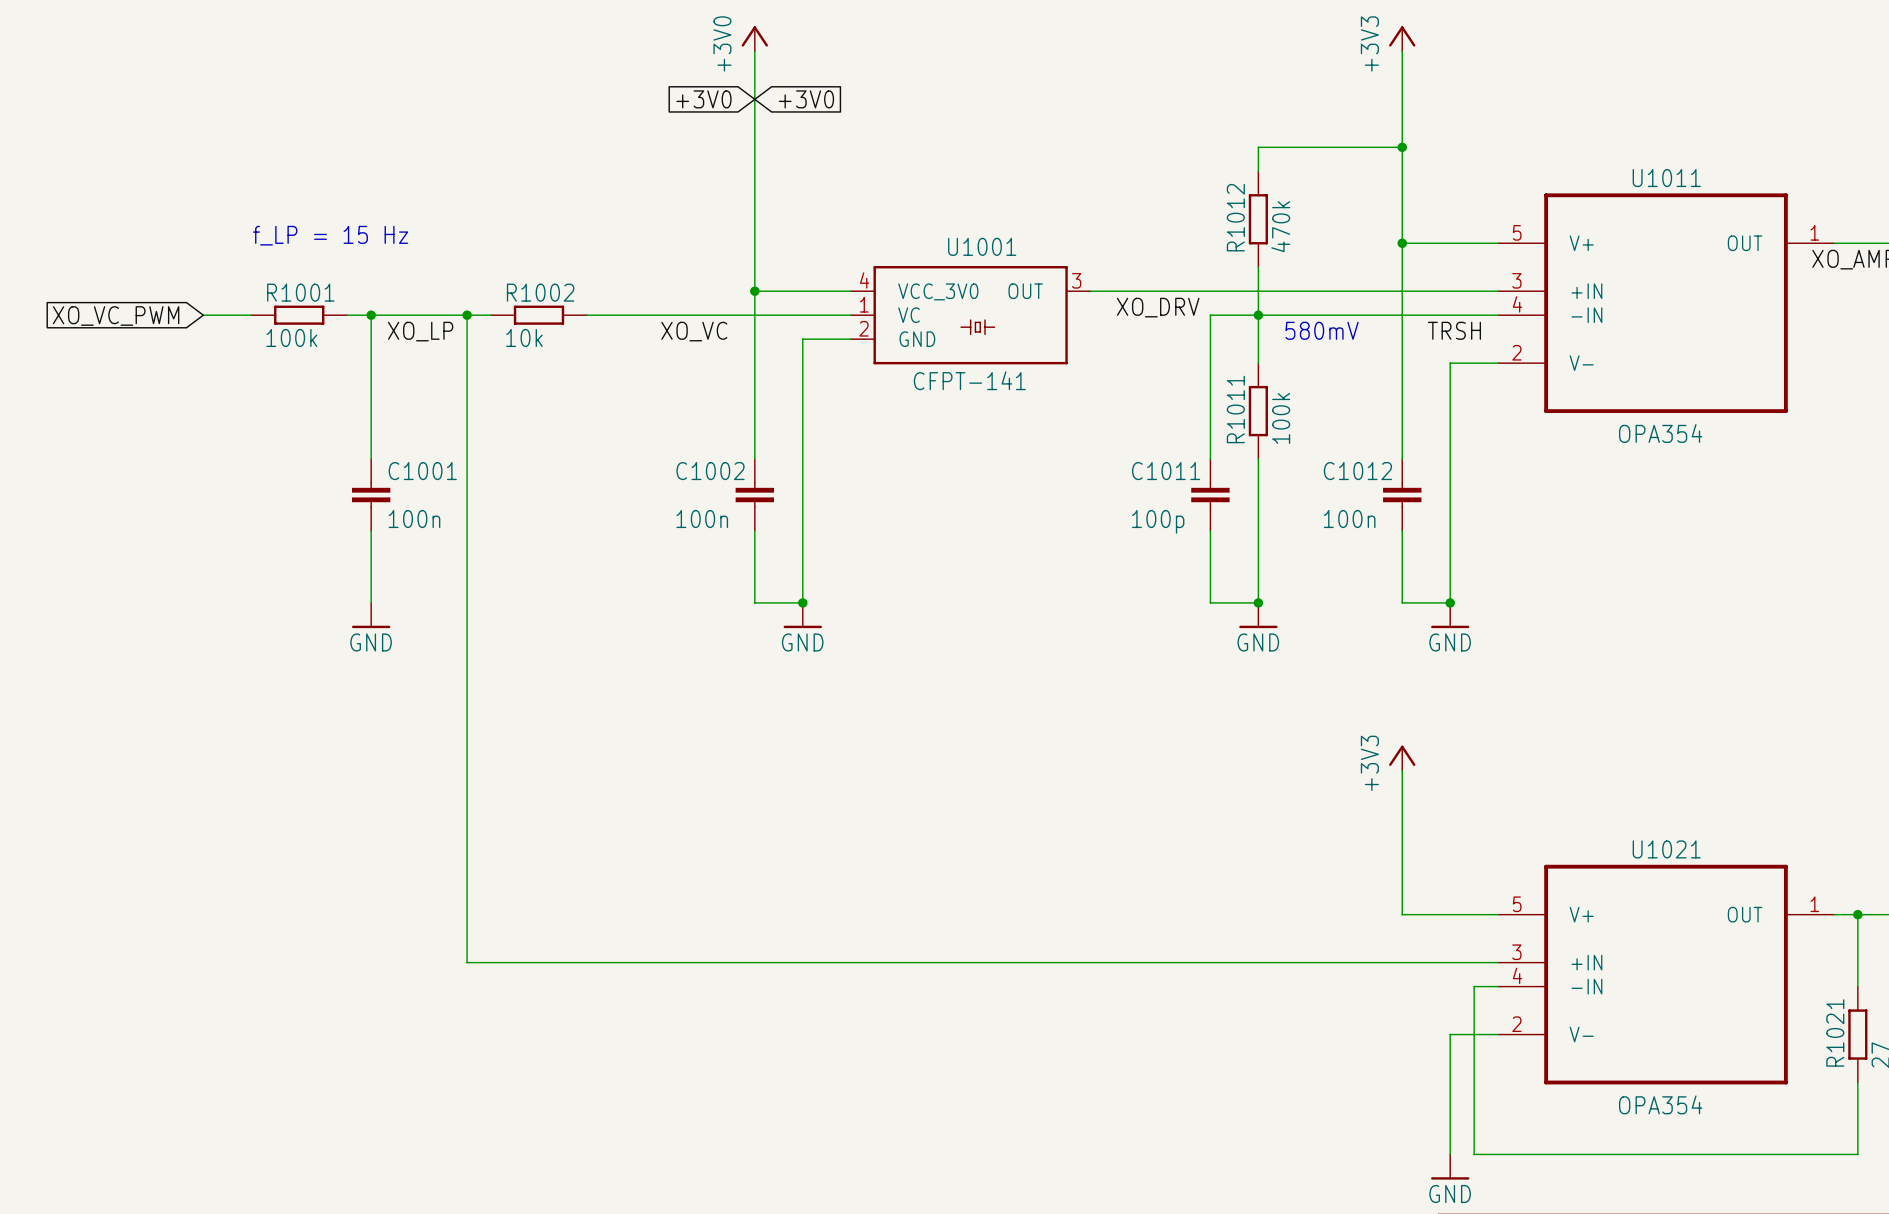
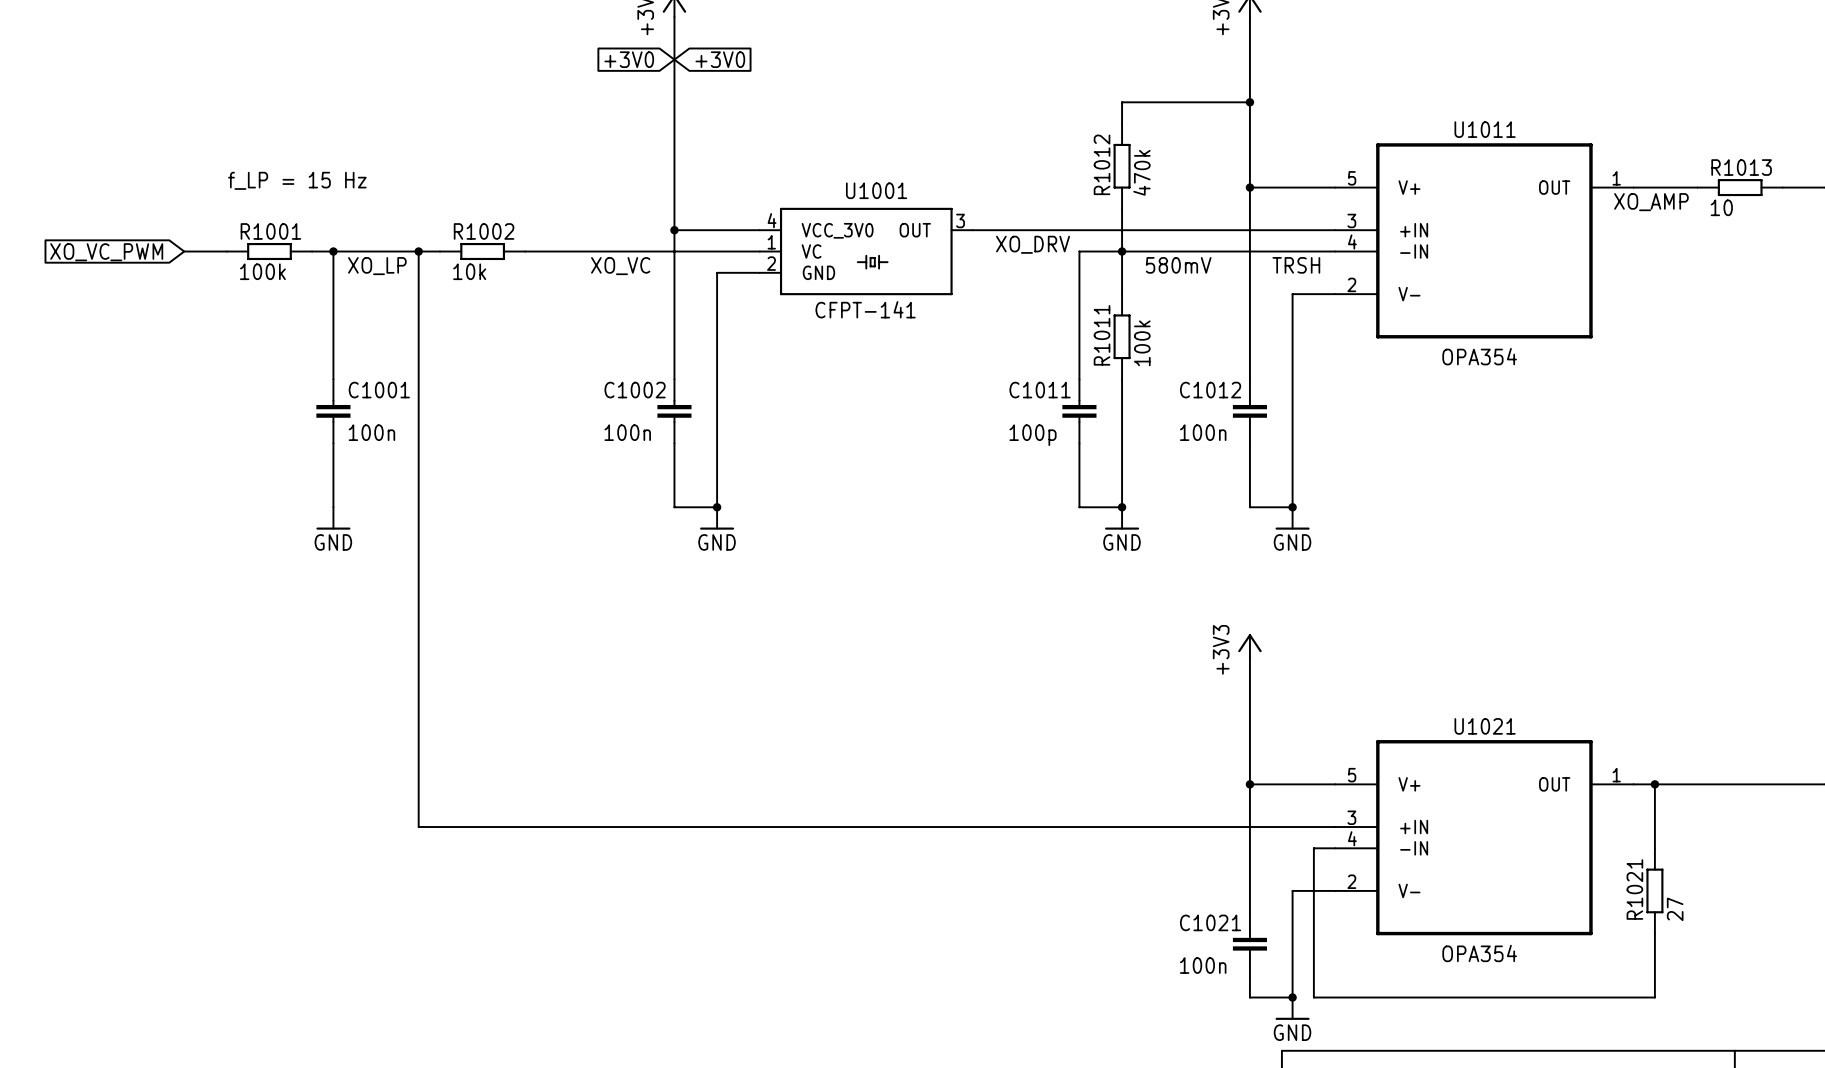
wire: none -> (1249, 784) (1249, 912)
junction: none -> (1249, 784)
C1021: none -> 100n (1249, 944)
wire: none -> (1249, 976) (1249, 997) (1292, 997)
junction: none -> (1292, 997)

